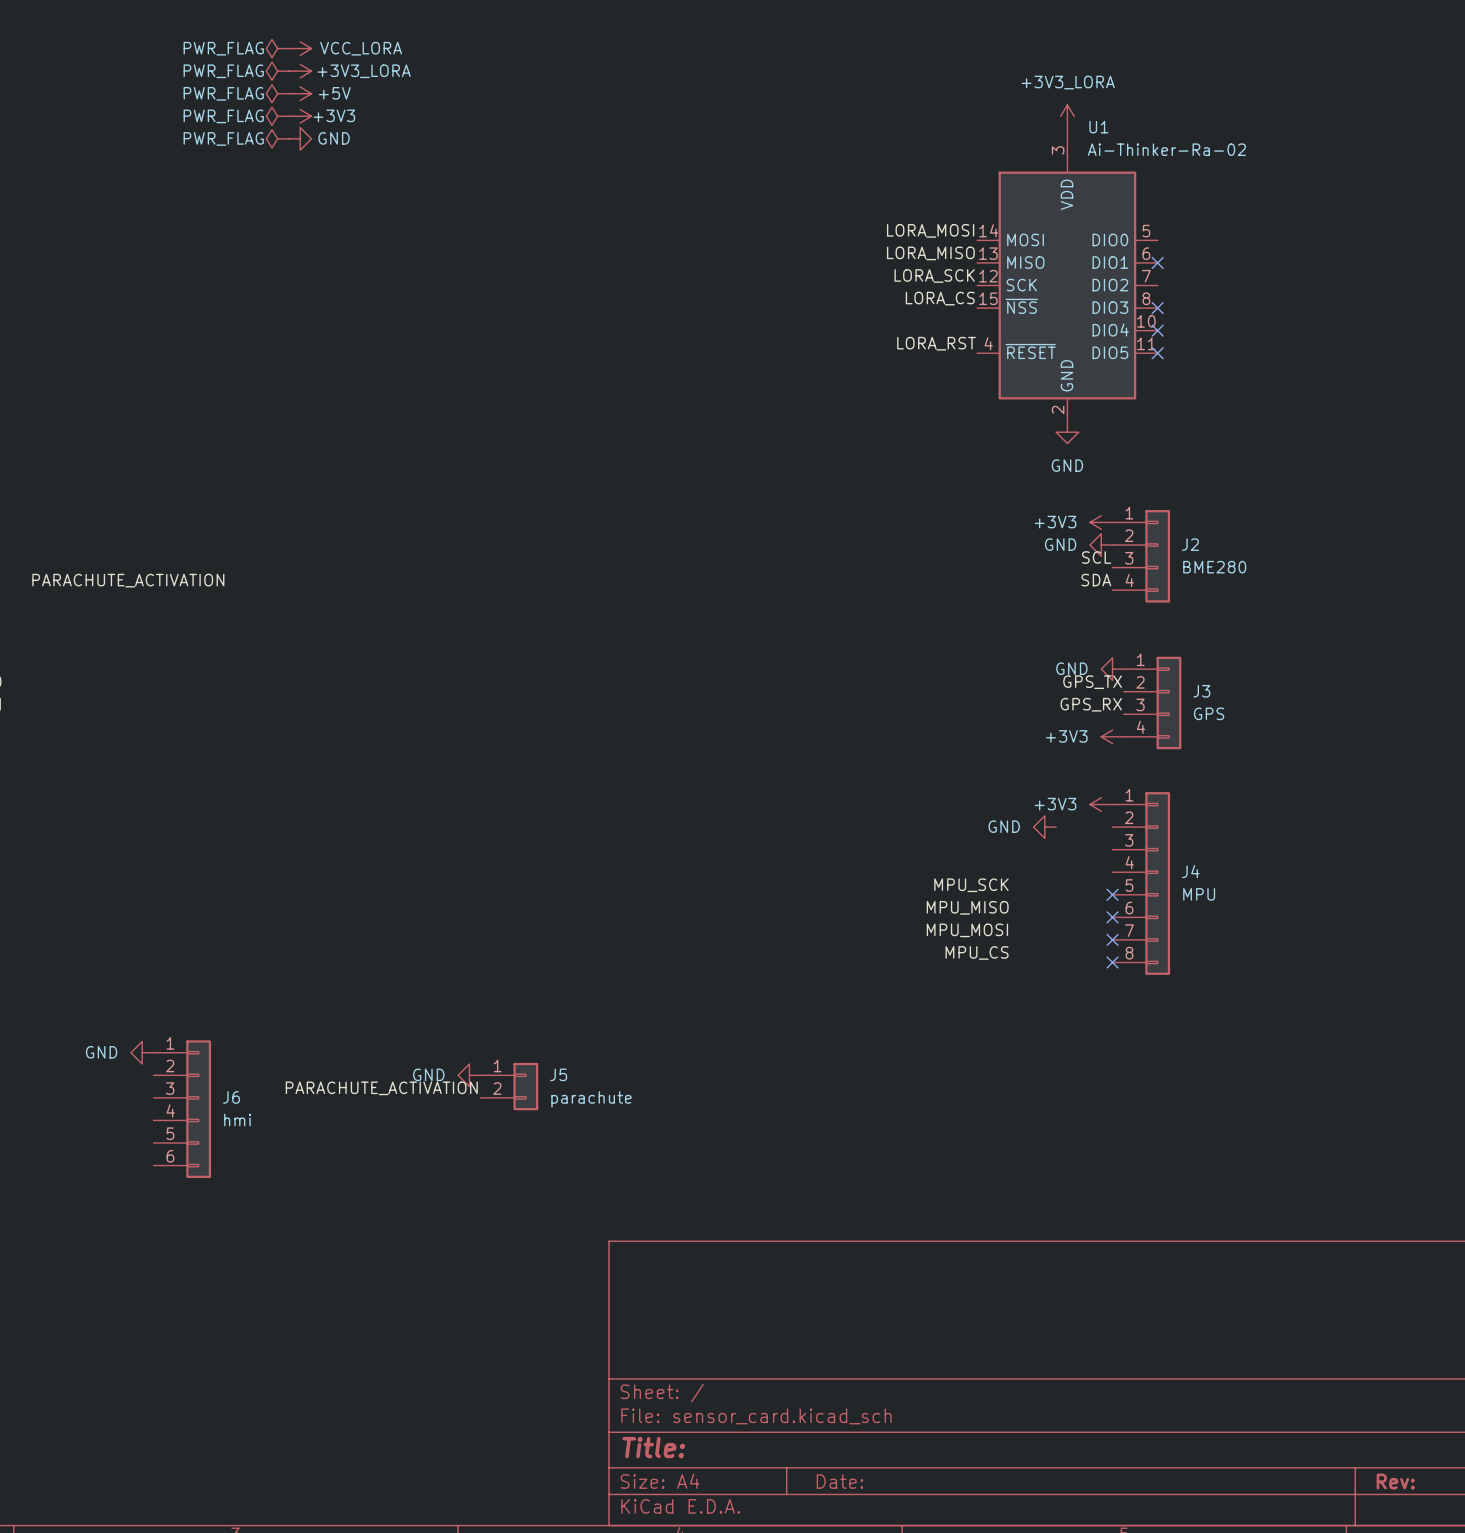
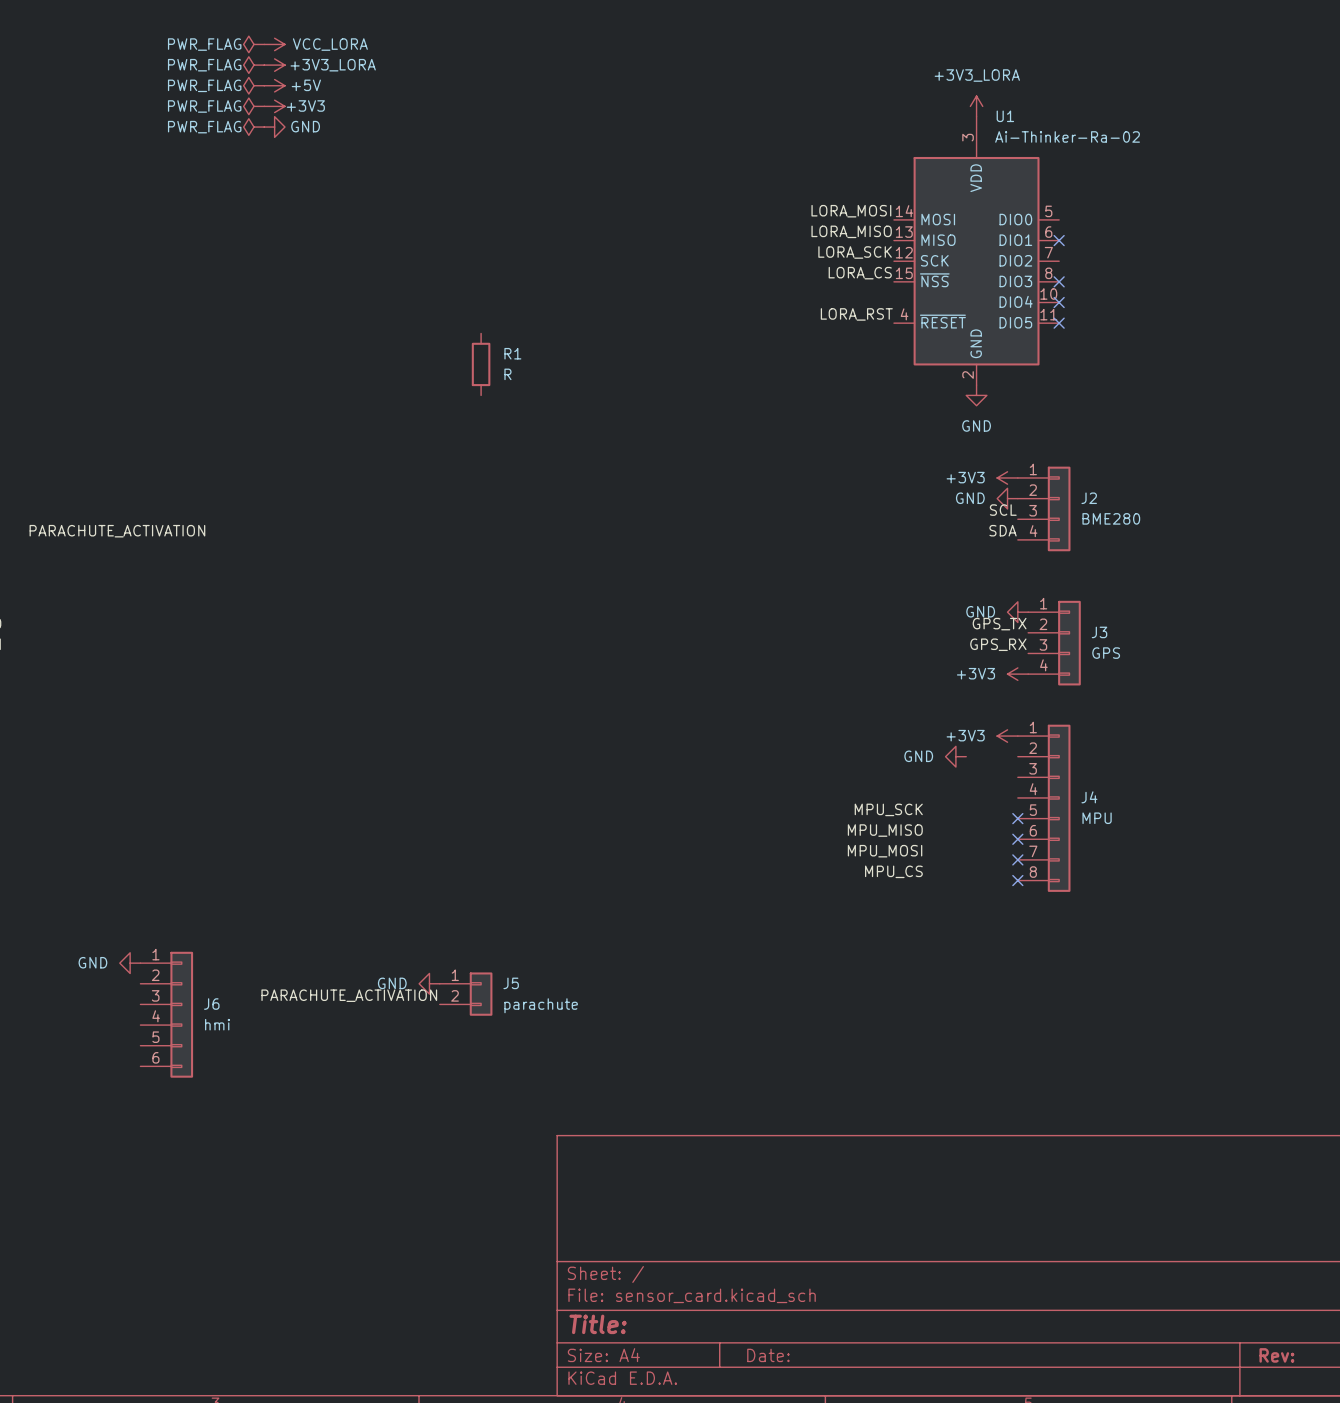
R1: none -> R (481, 364)

